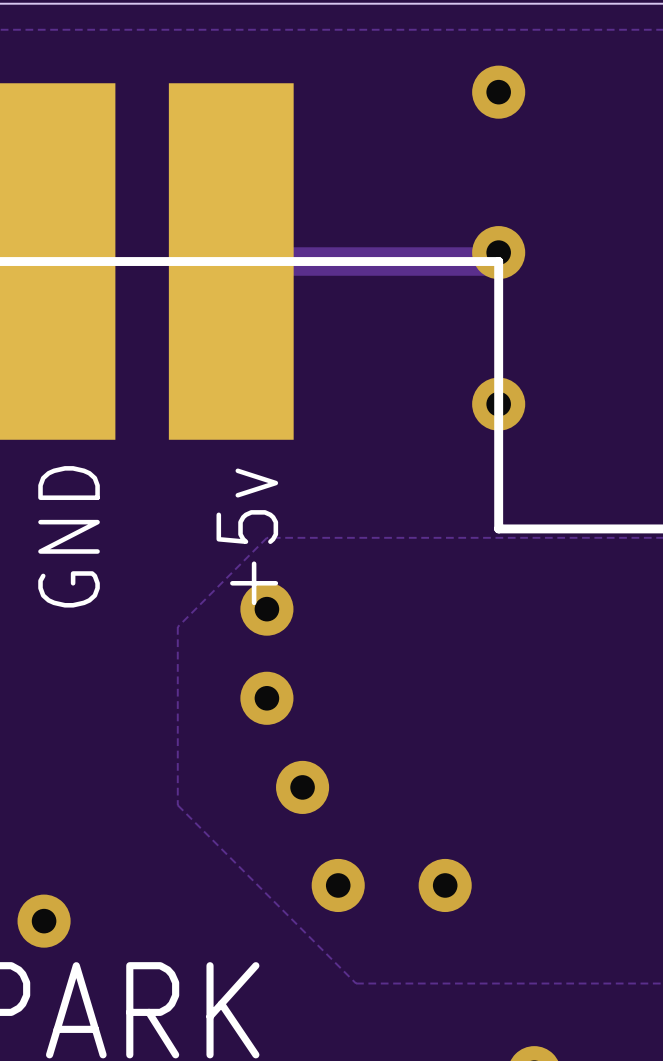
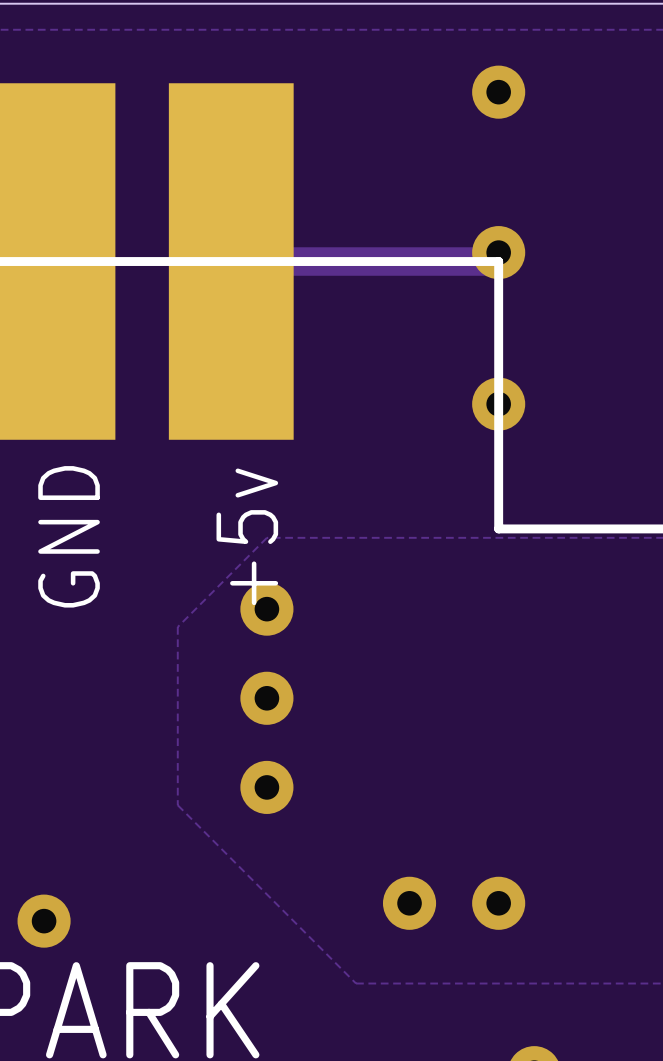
via position: (302, 787) -> (266, 787)
via: (338, 885) -> none
via position: (445, 885) -> (409, 903)
via: none -> (498, 903)

